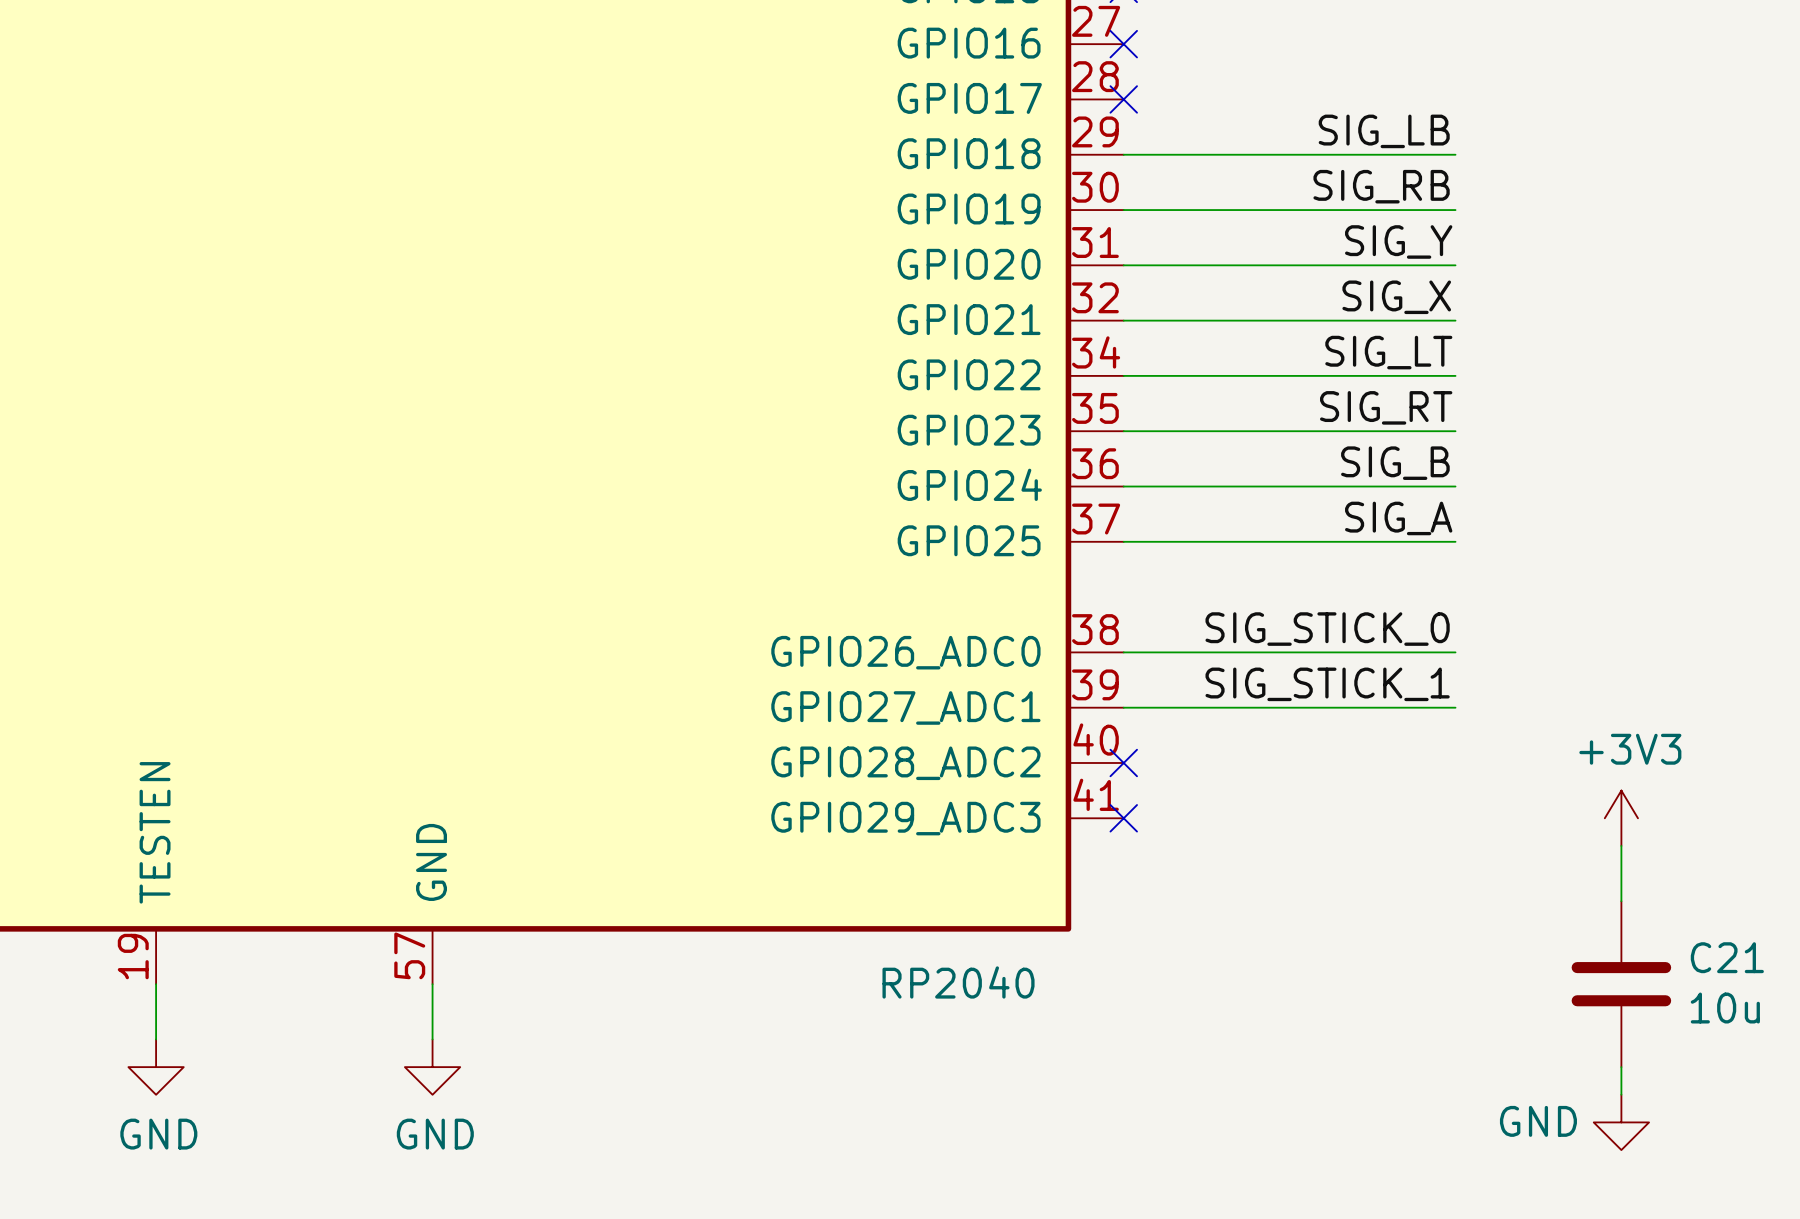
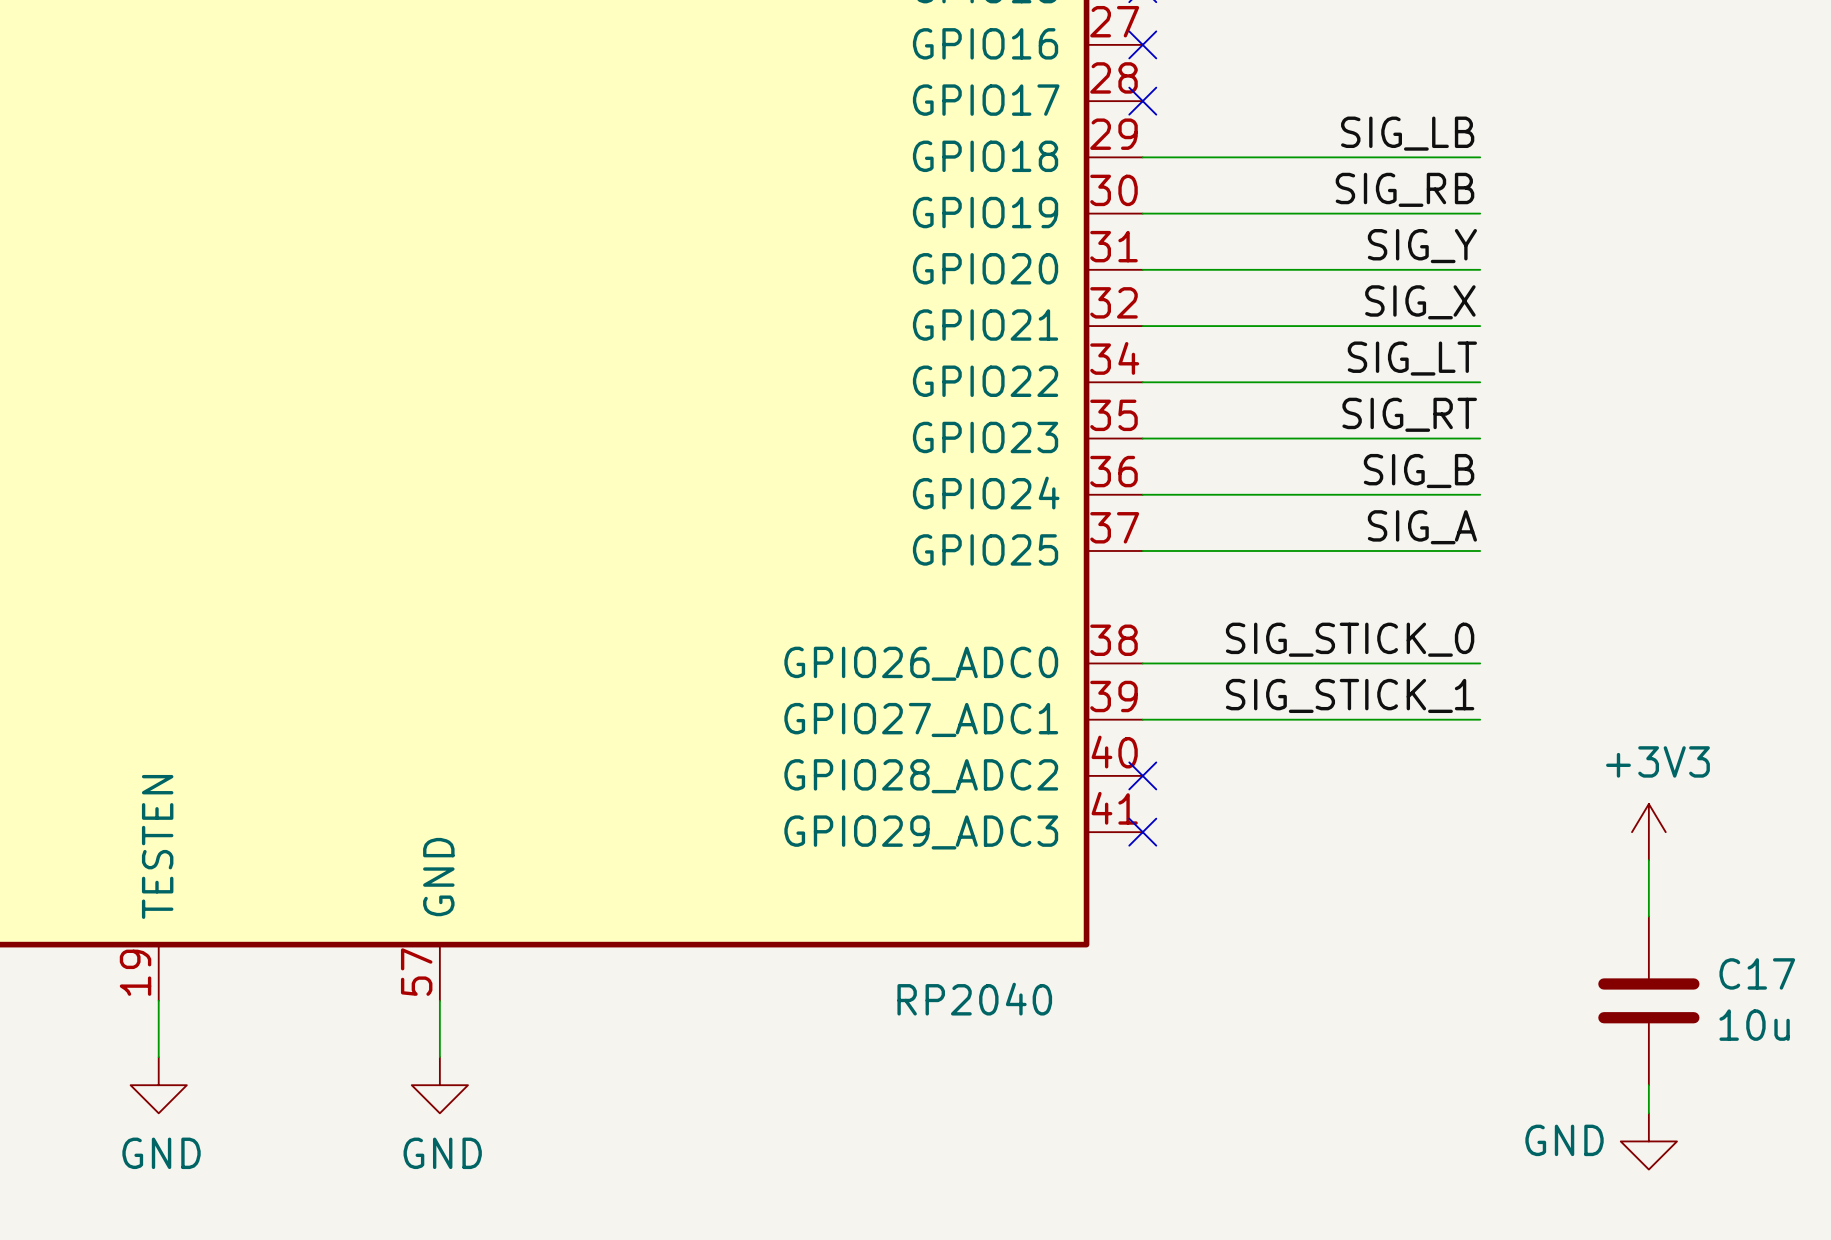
C21 name: C21 (1727, 957) -> C17 (1757, 973)

